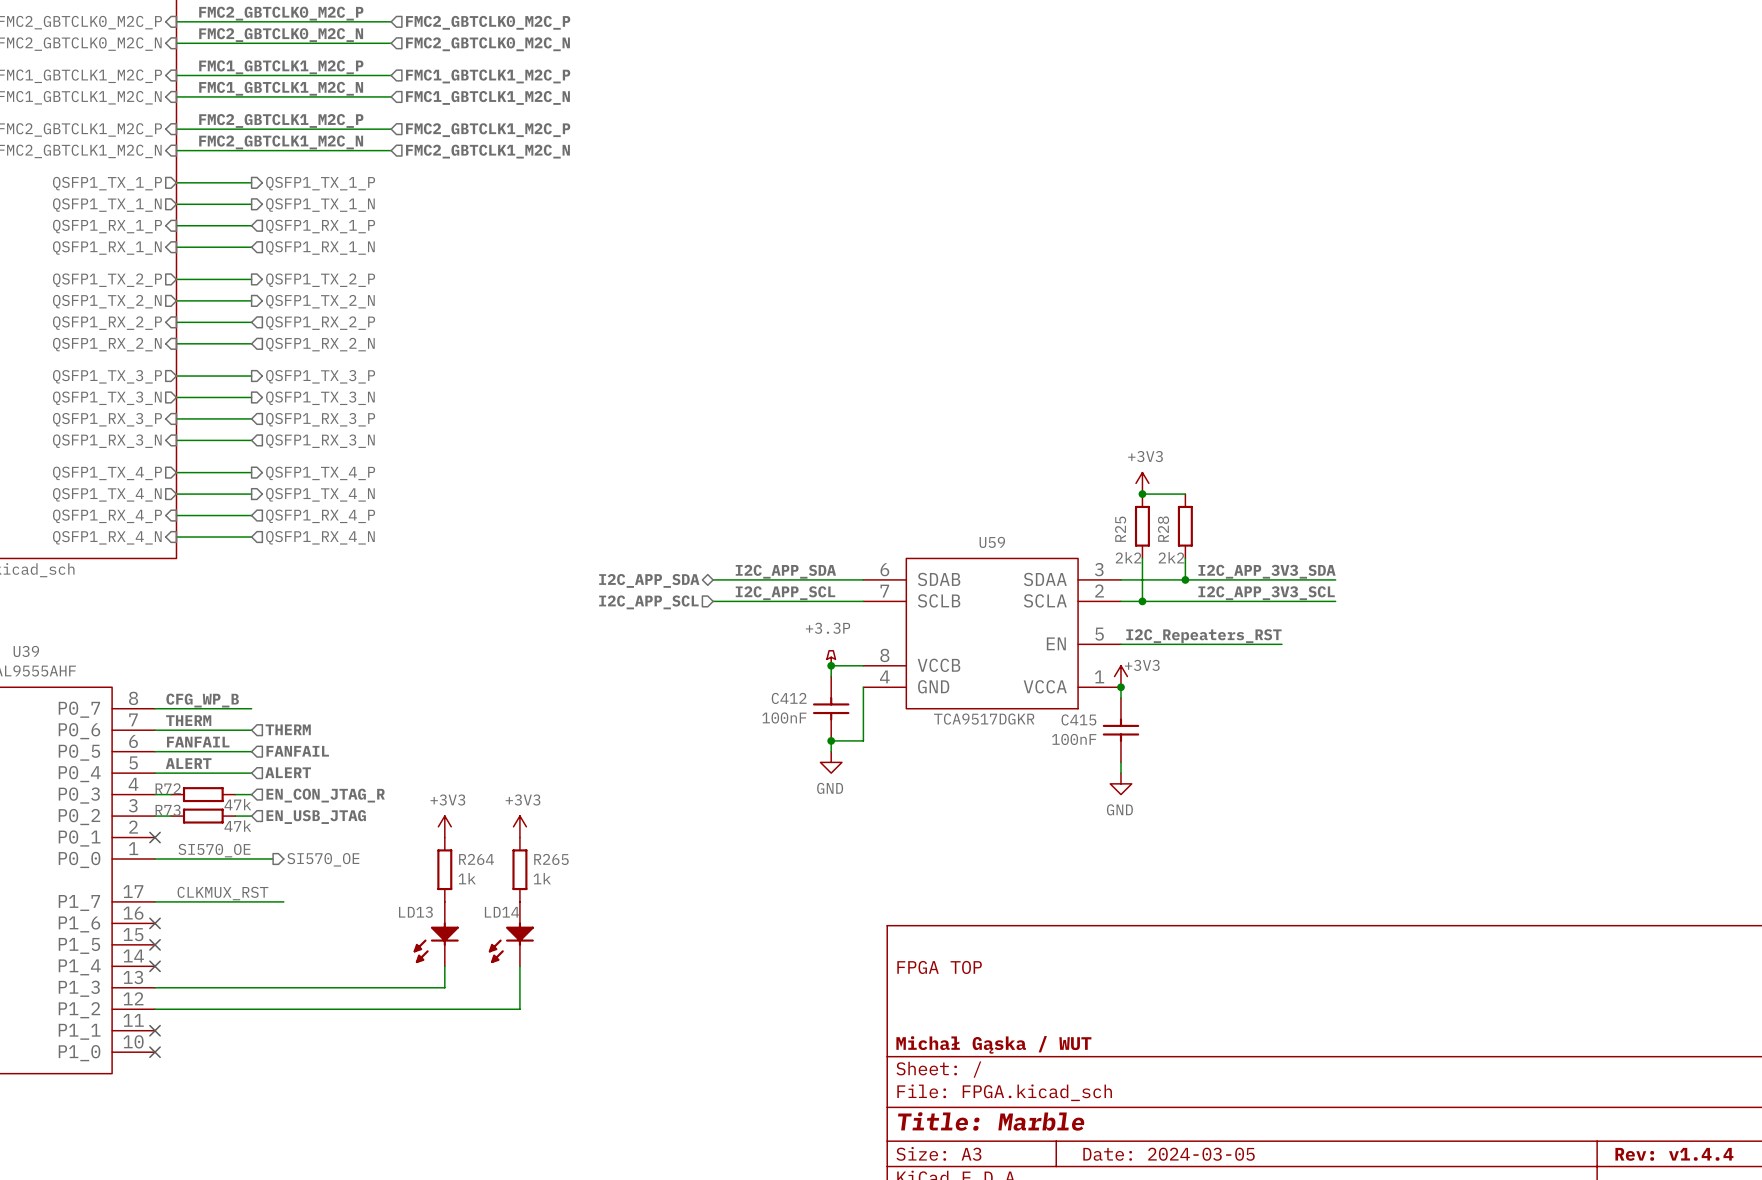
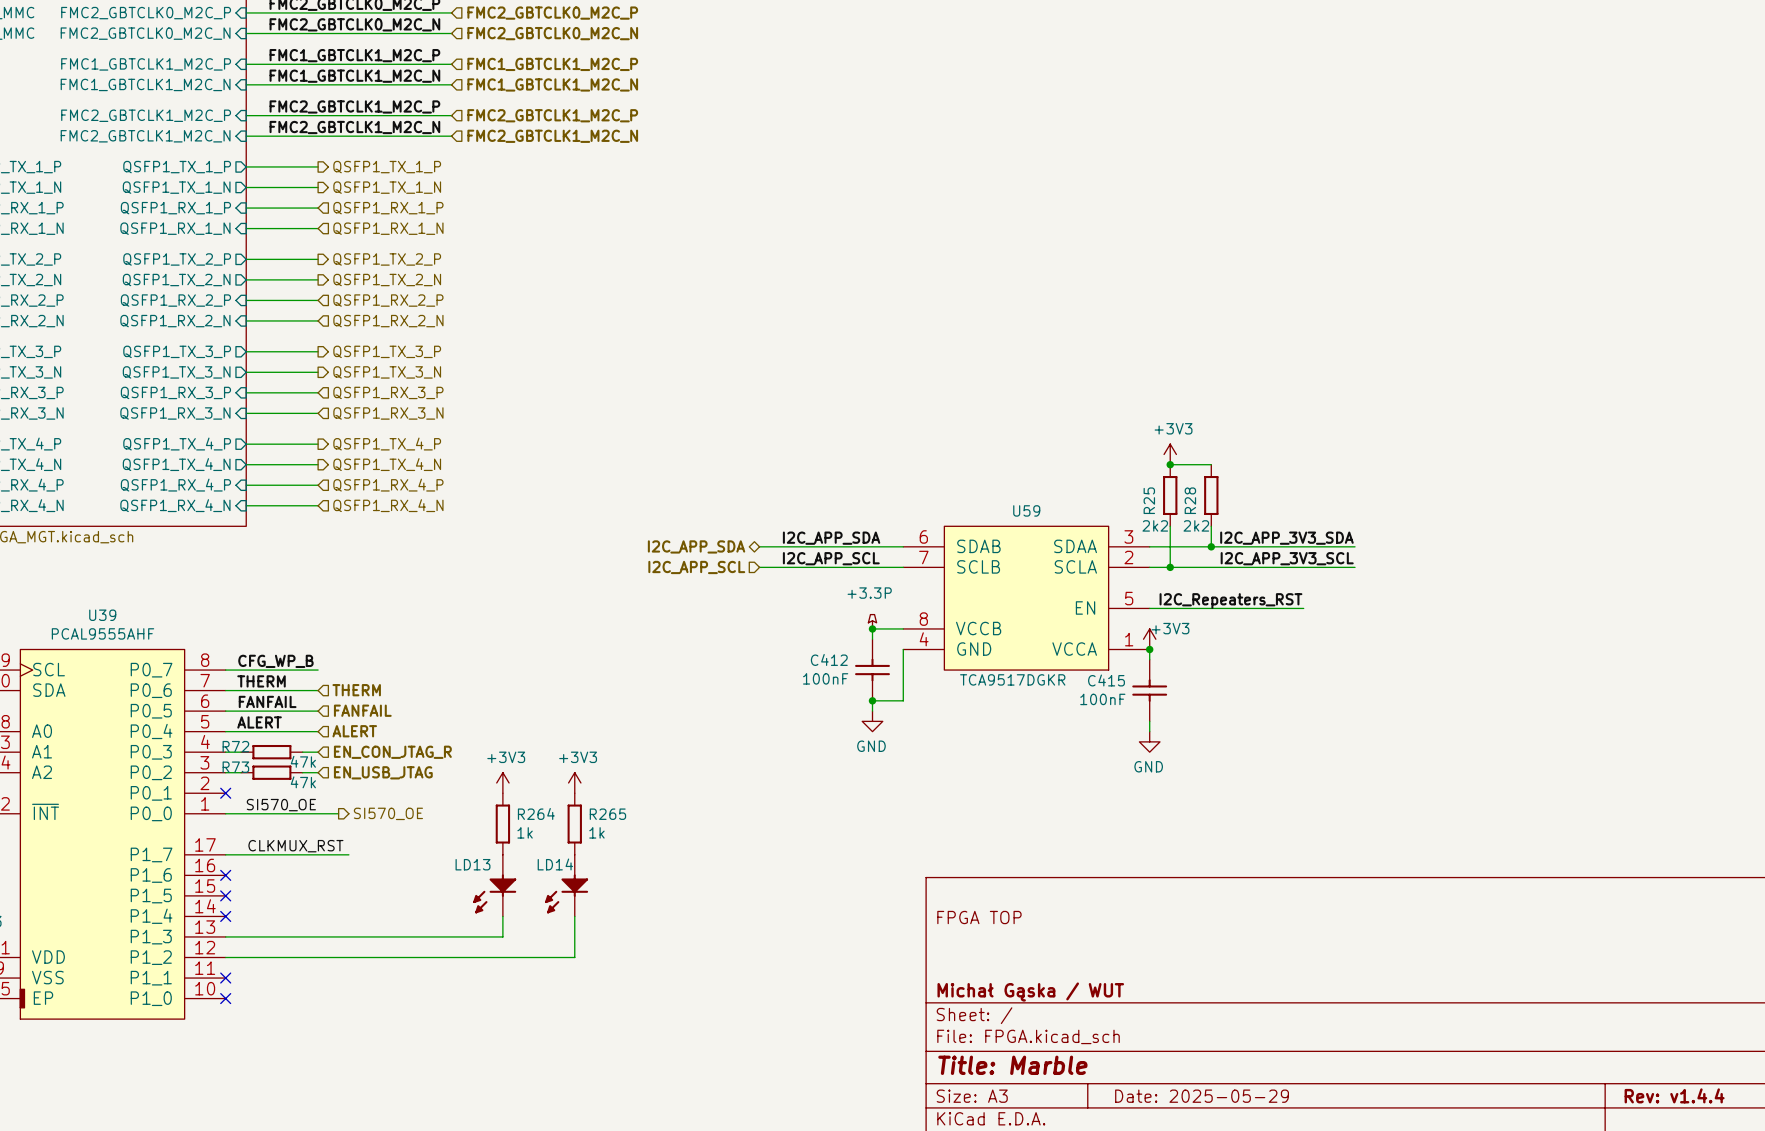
title block: Date: 2024-03-05 (1169, 1154) -> Date: 2025-05-29 (1202, 1096)

